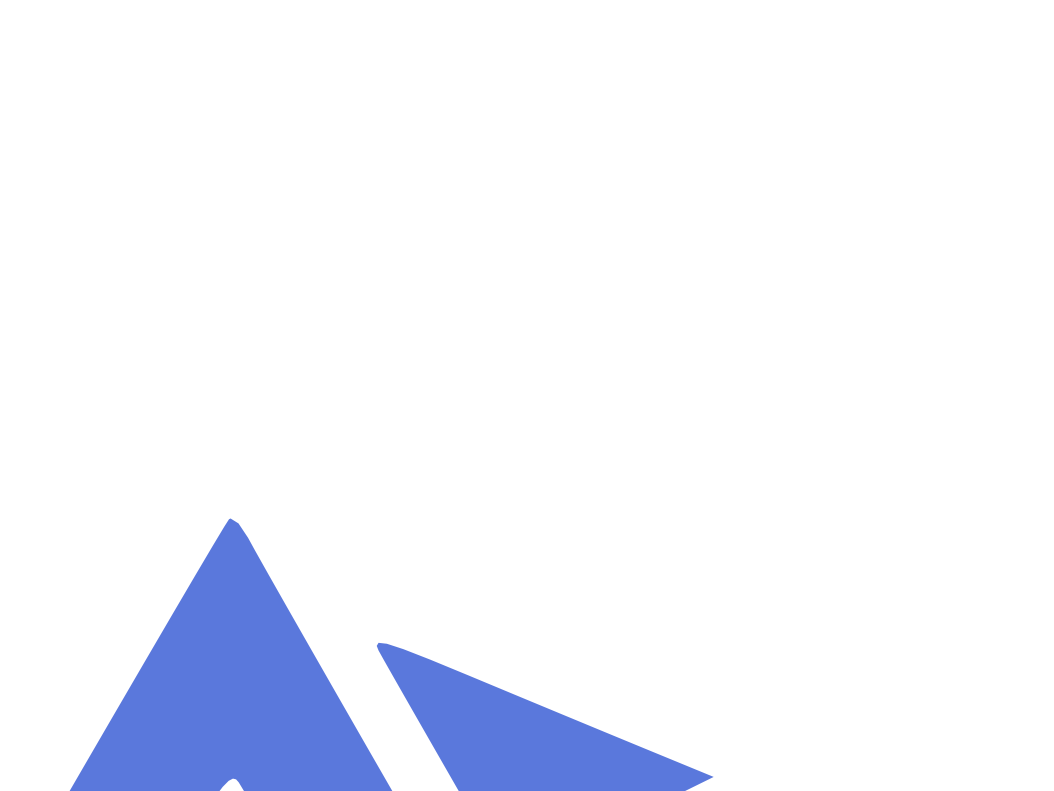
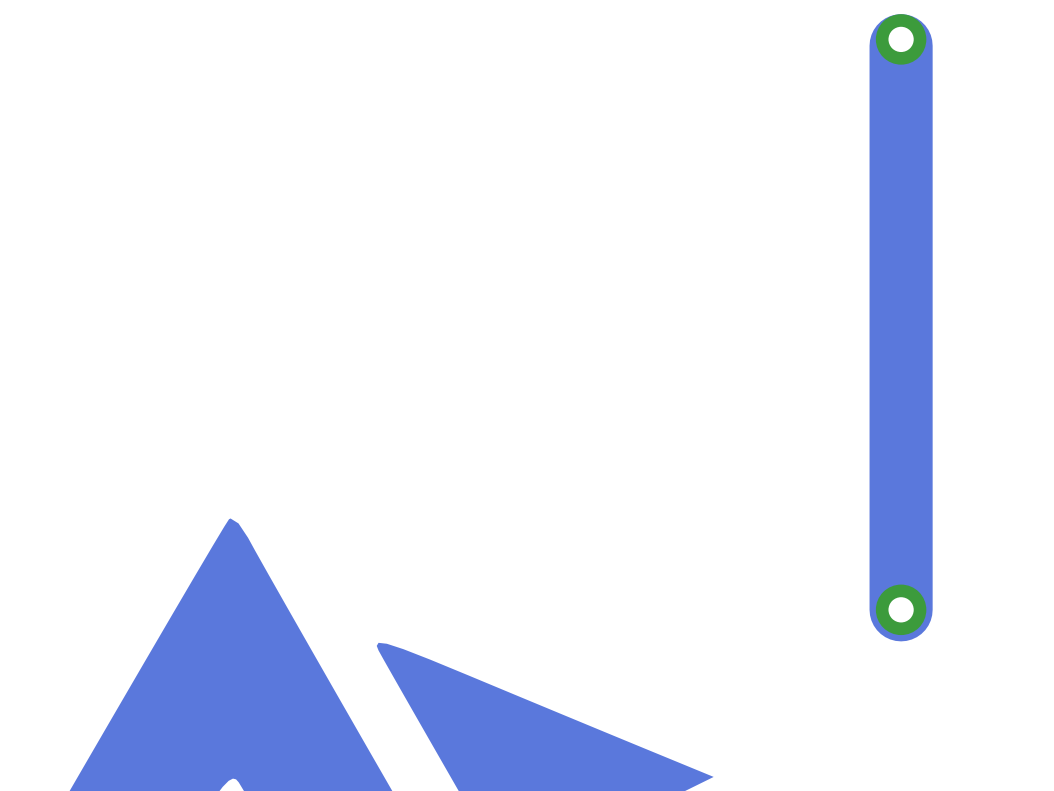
via: none -> (901, 39)
track: none -> (901, 45) (901, 609)
via: none -> (901, 609)

